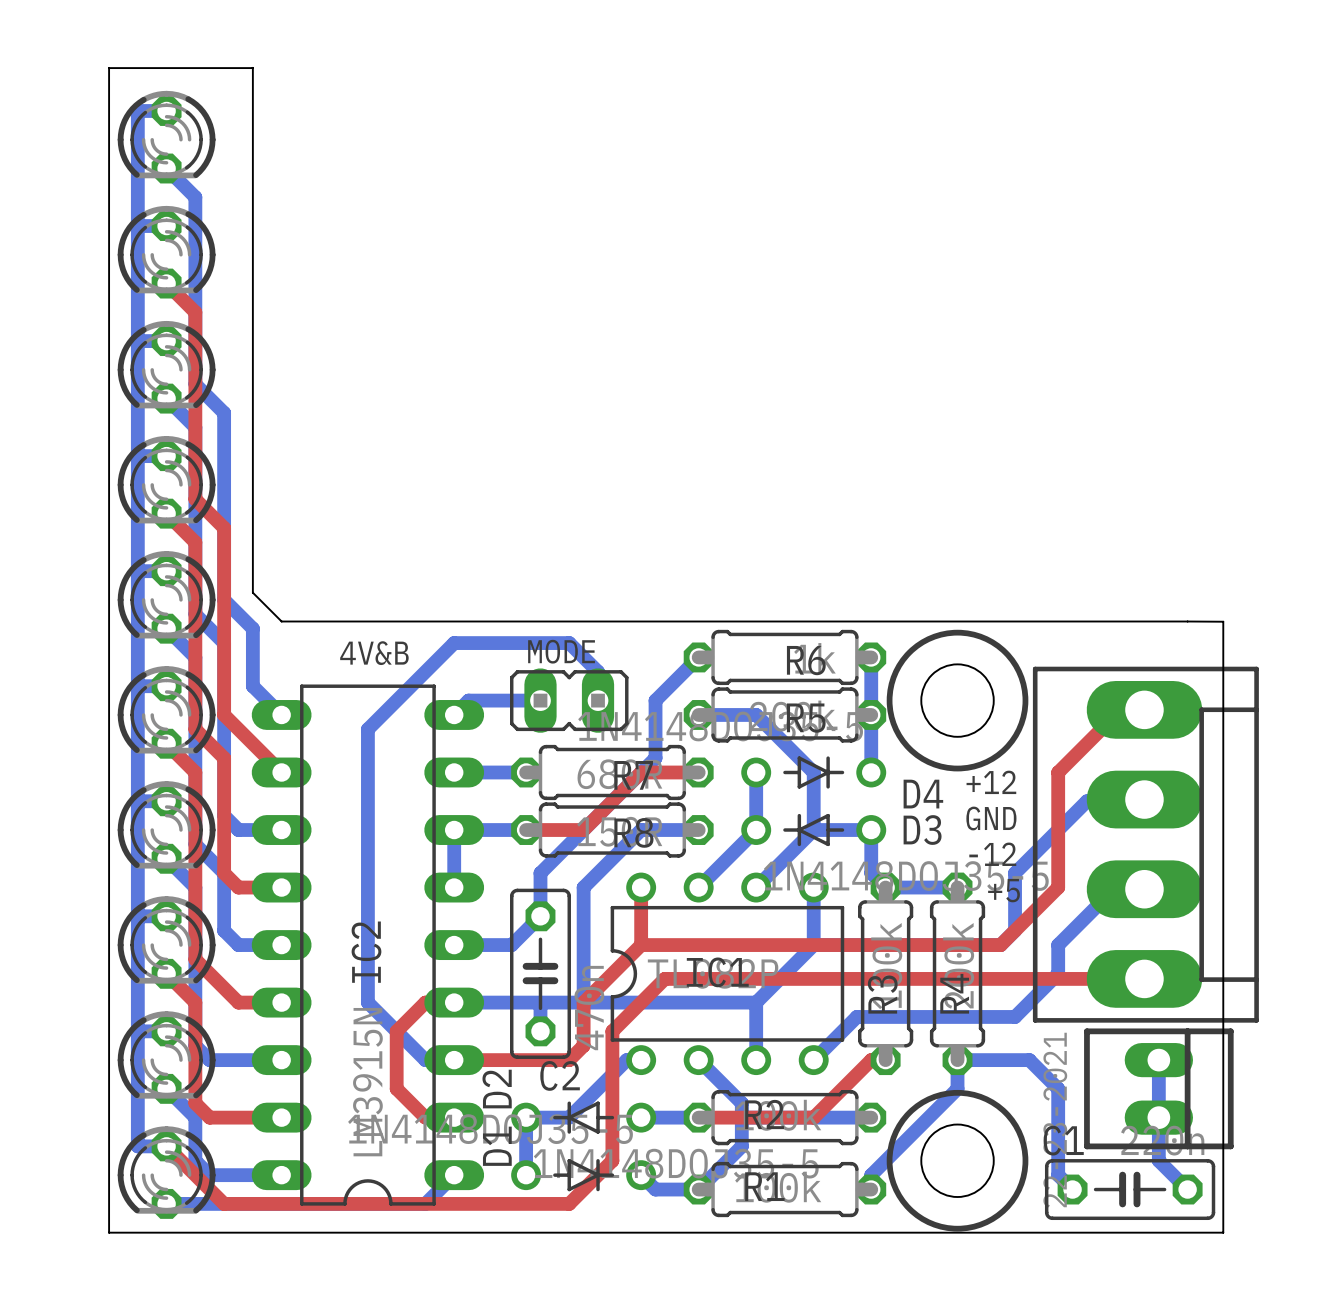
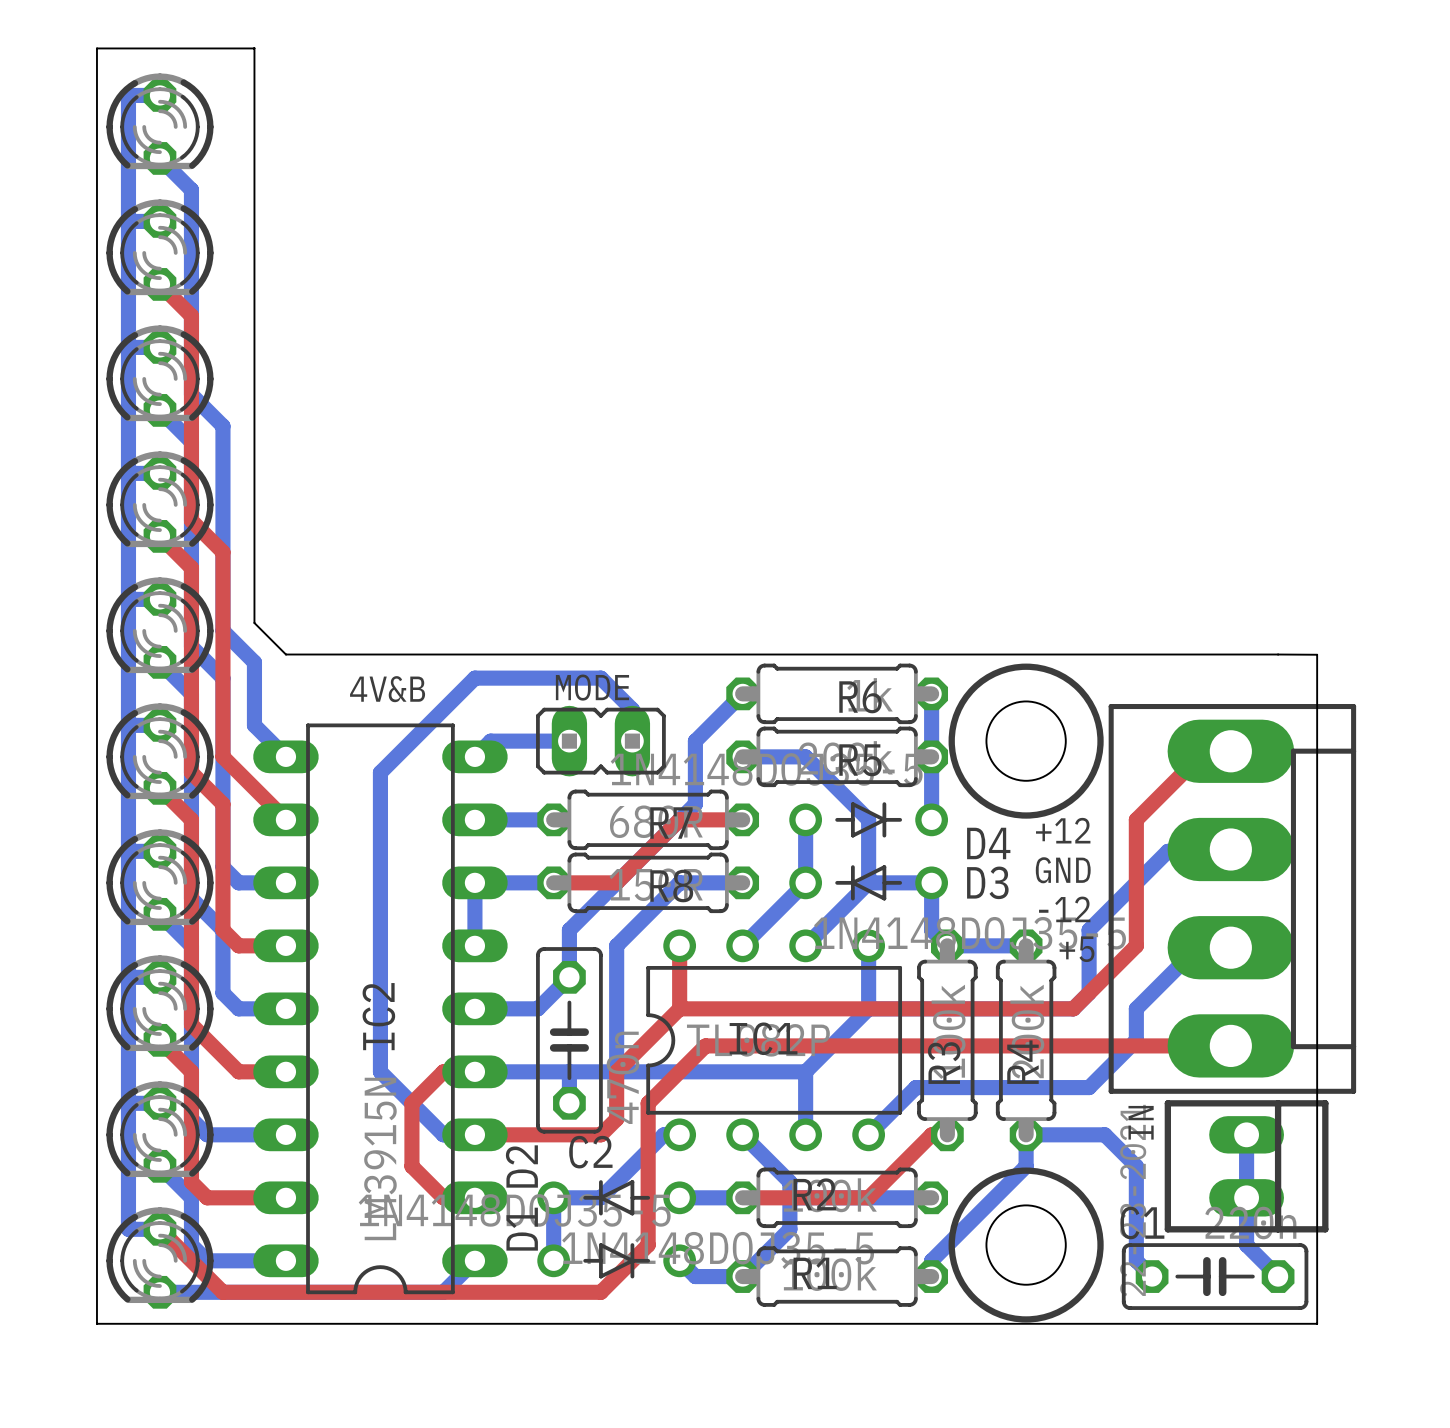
IN name: none -> IN (1141, 1122)

